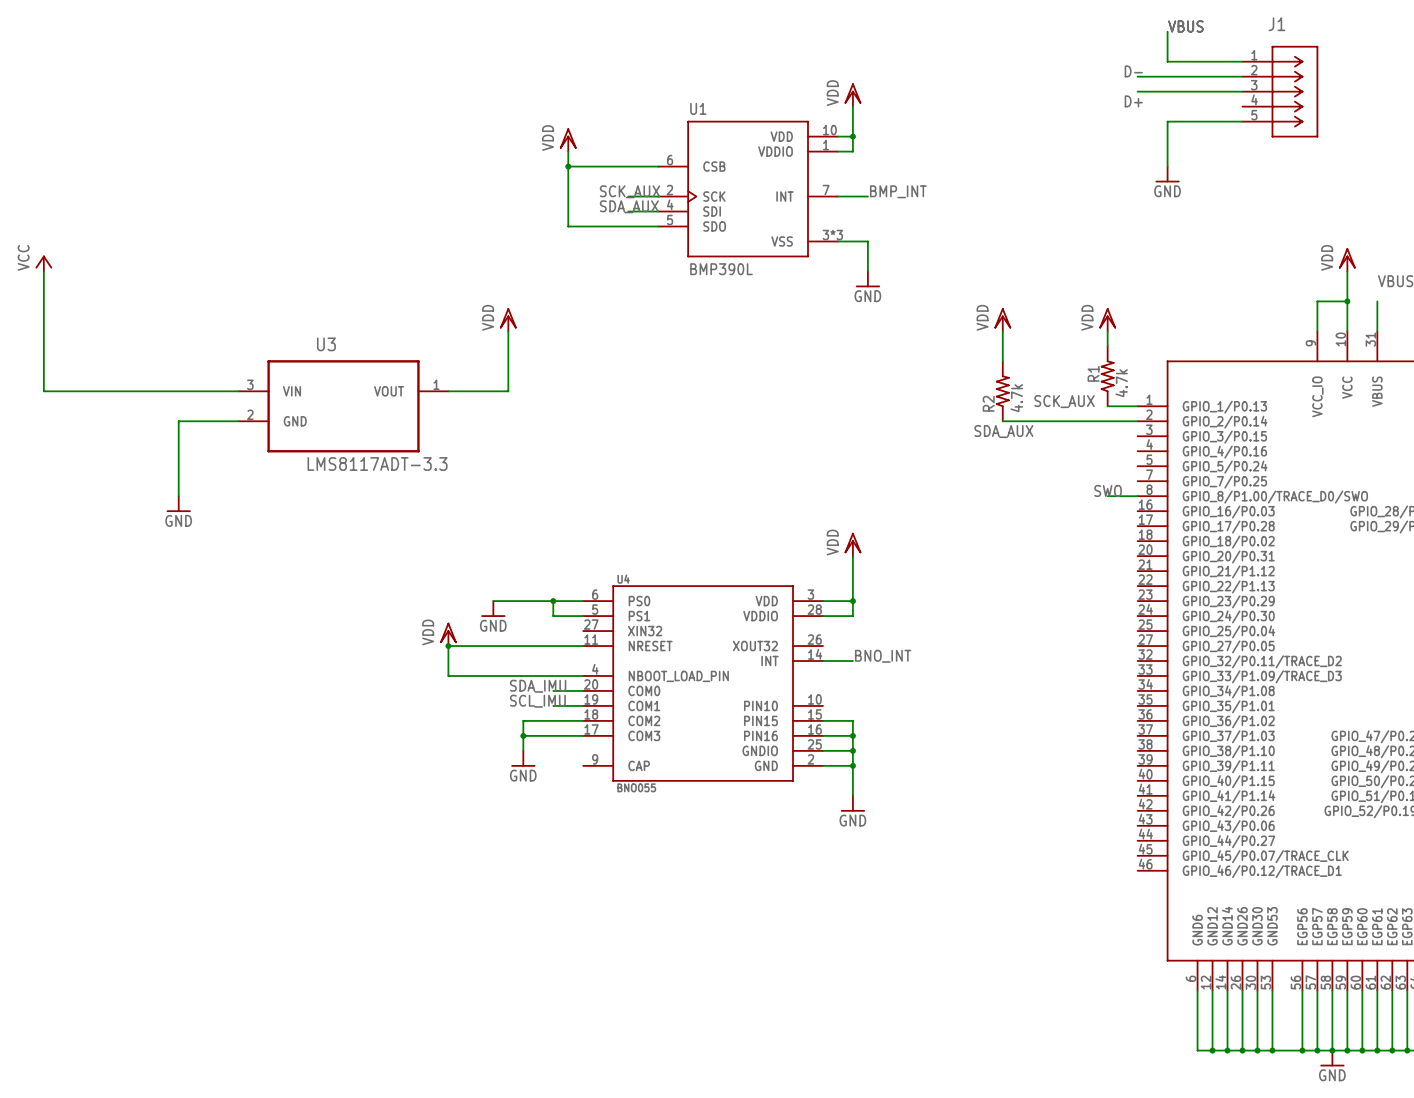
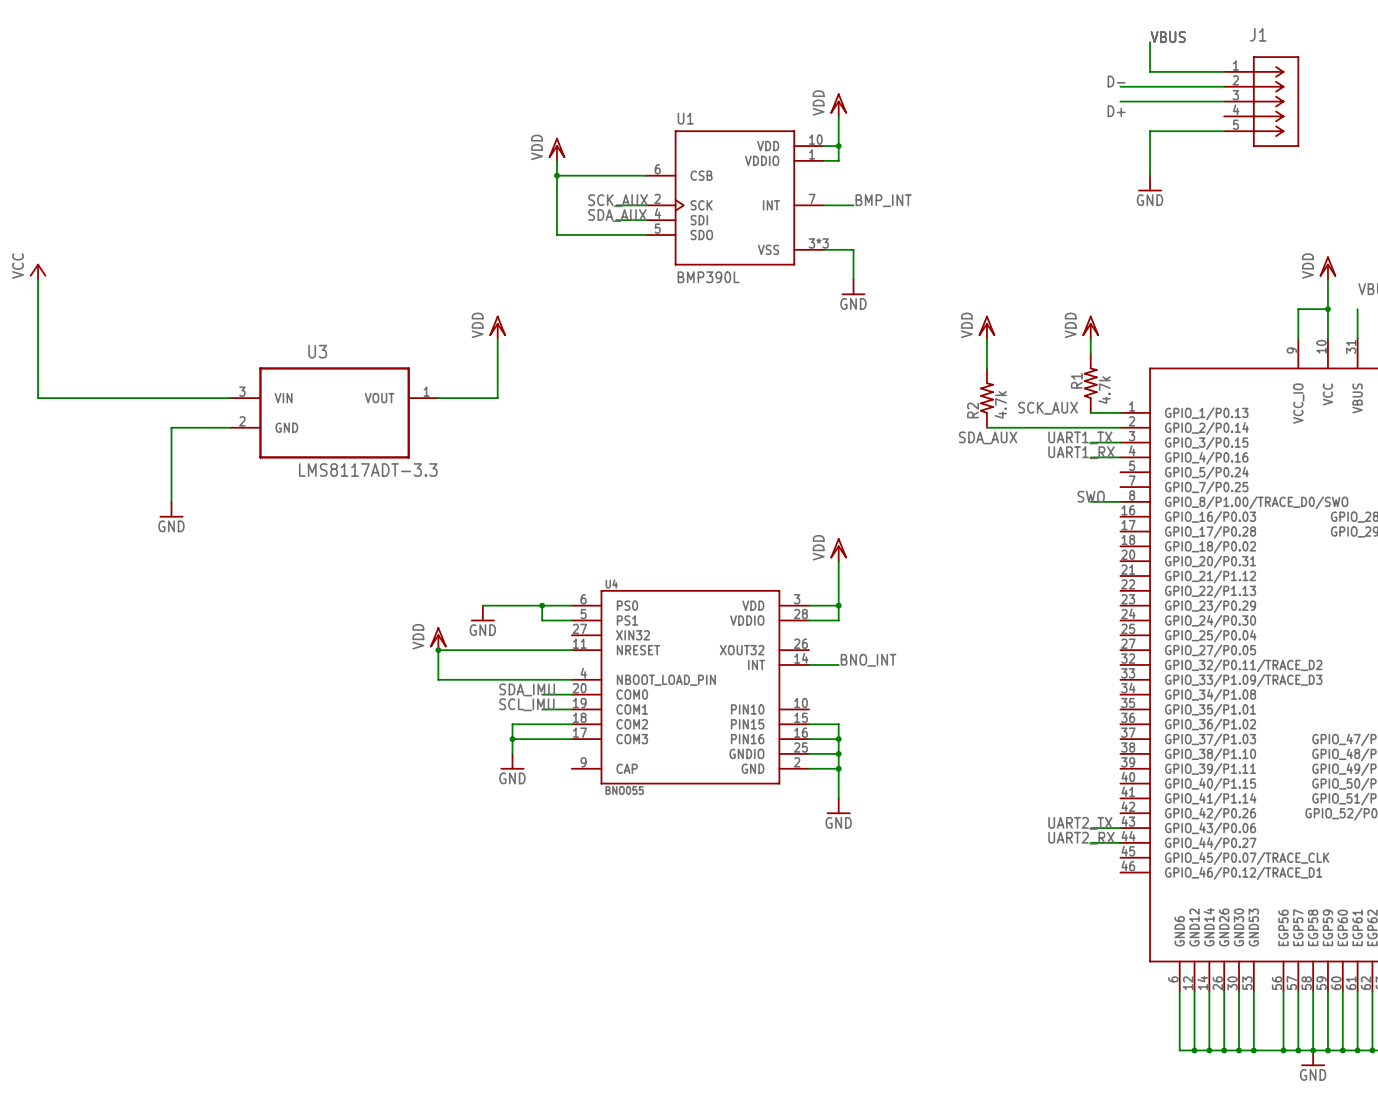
label: none -> UART1_TX (1080, 437)
wire: none -> (1090, 442) (1120, 442)
label: none -> UART1_RX (1081, 452)
wire: none -> (1090, 457) (1120, 457)
label: none -> UART2_TX (1080, 823)
wire: none -> (1090, 828) (1120, 828)
label: none -> UART2_RX (1081, 838)
wire: none -> (1090, 842) (1120, 842)

